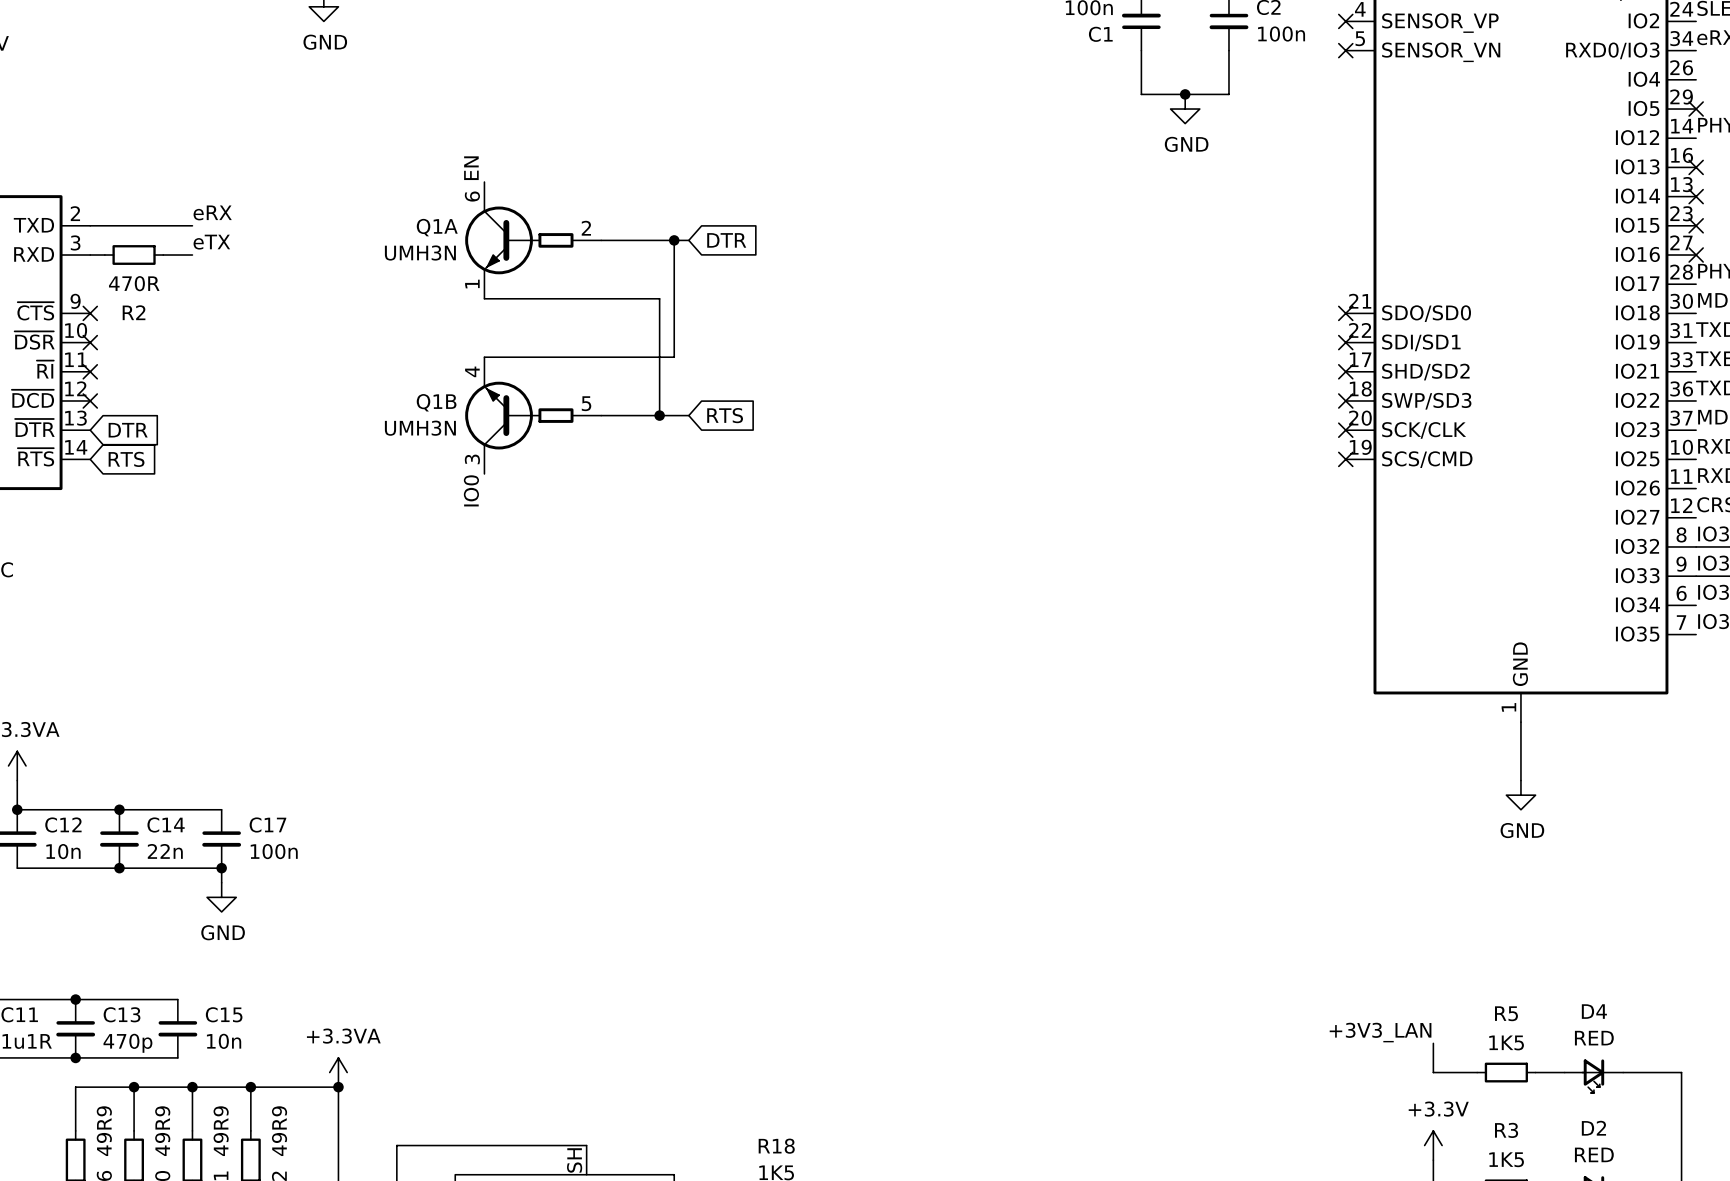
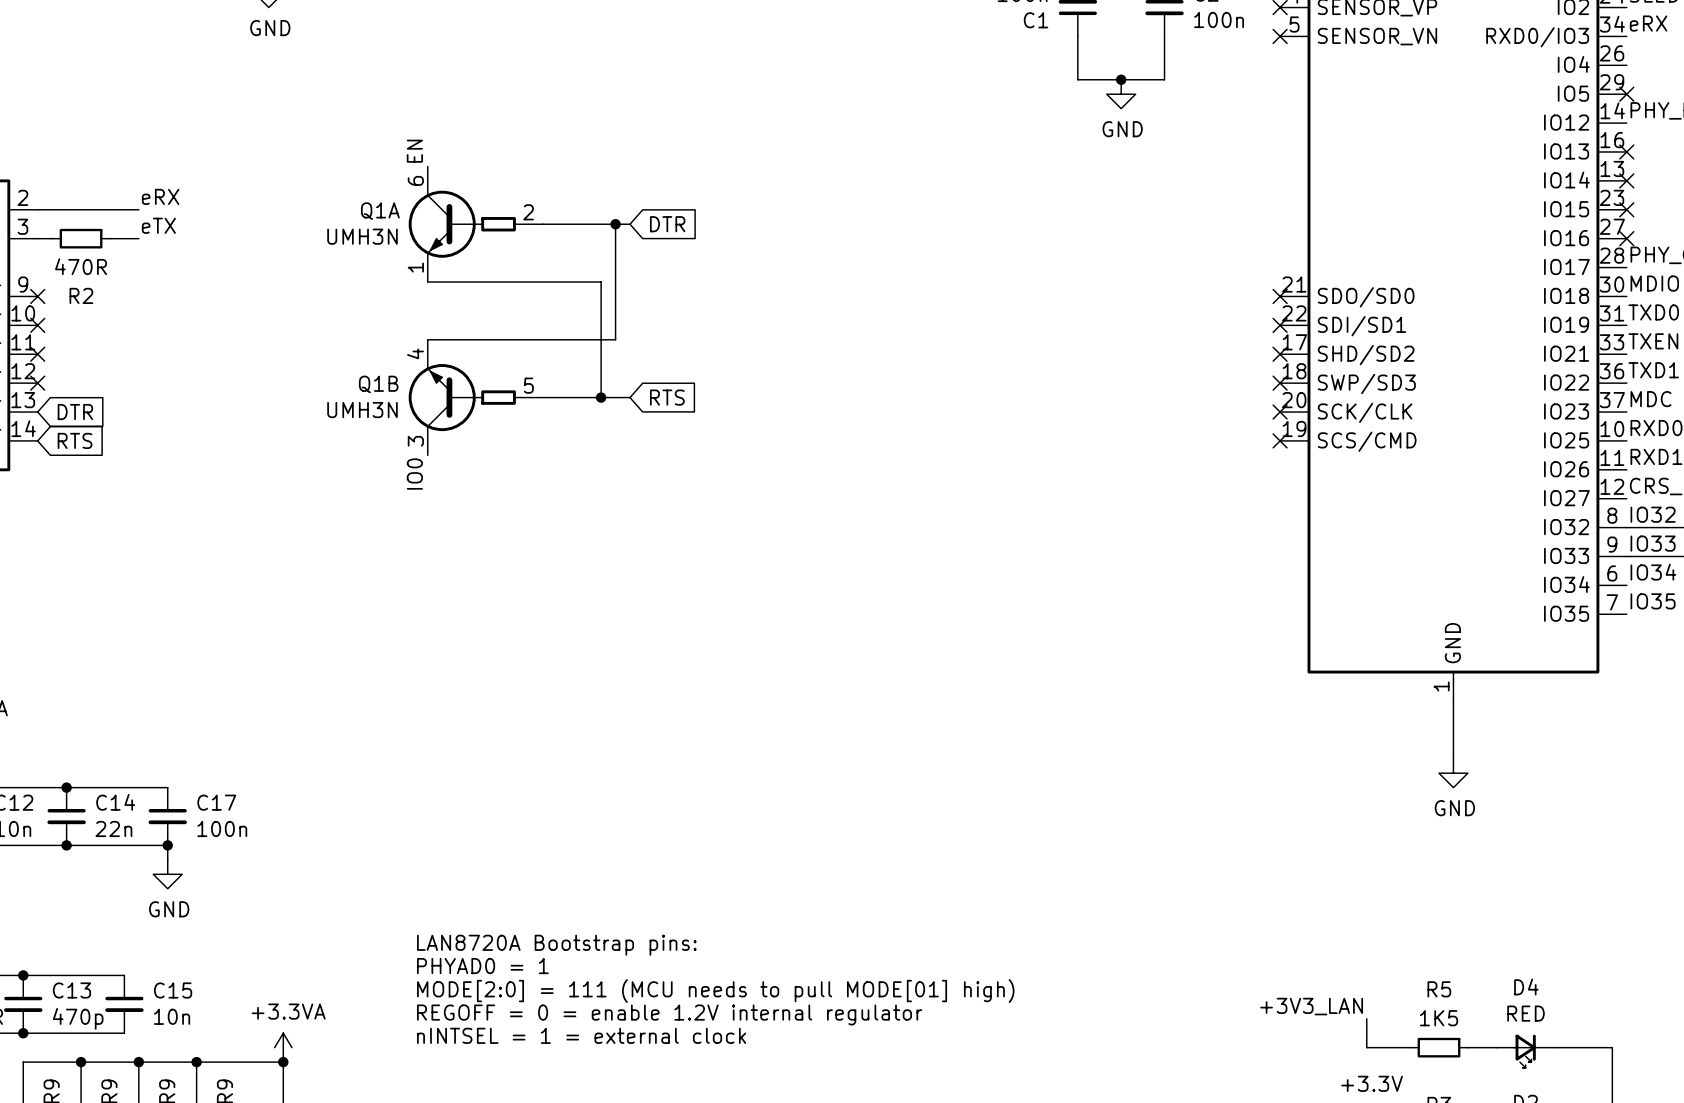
text: none -> LAN8720A Bootstrap pins: (556, 945)
text: none -> PHYAD0 = 1 (482, 966)
text: none -> MODE[2:0] = 111 (MCU needs to pull MODE[01] high) (715, 991)
text: none -> REGOFF = 0 = enable 1.2V internal regulator (669, 1014)
text: none -> nINTSEL = 1 = external clock (581, 1035)

